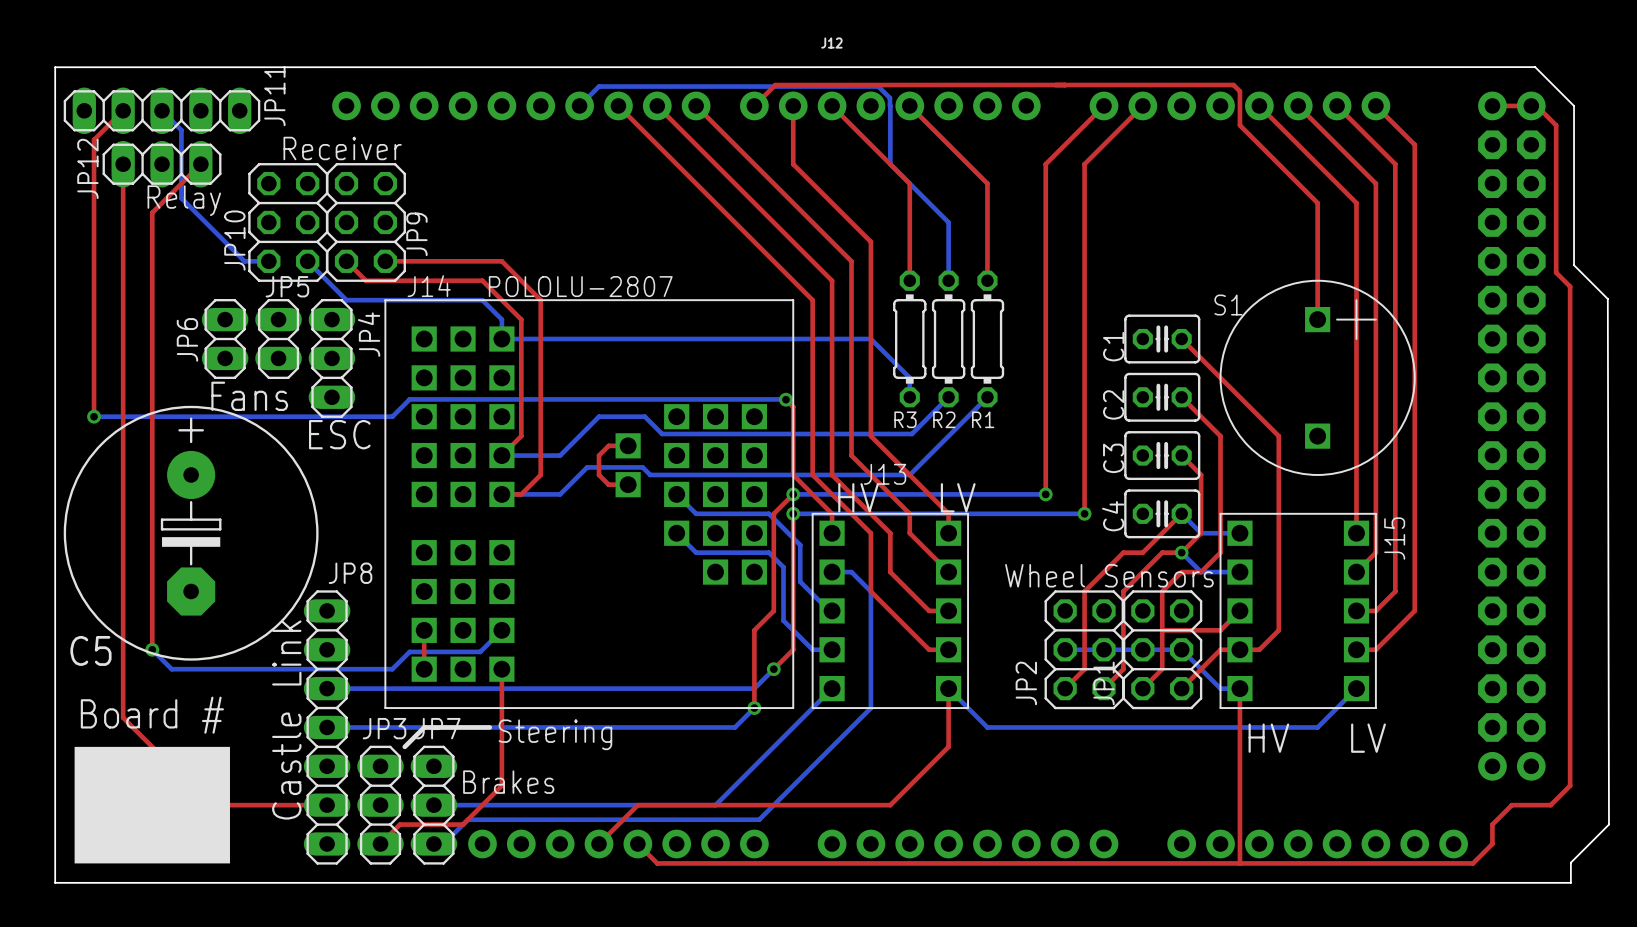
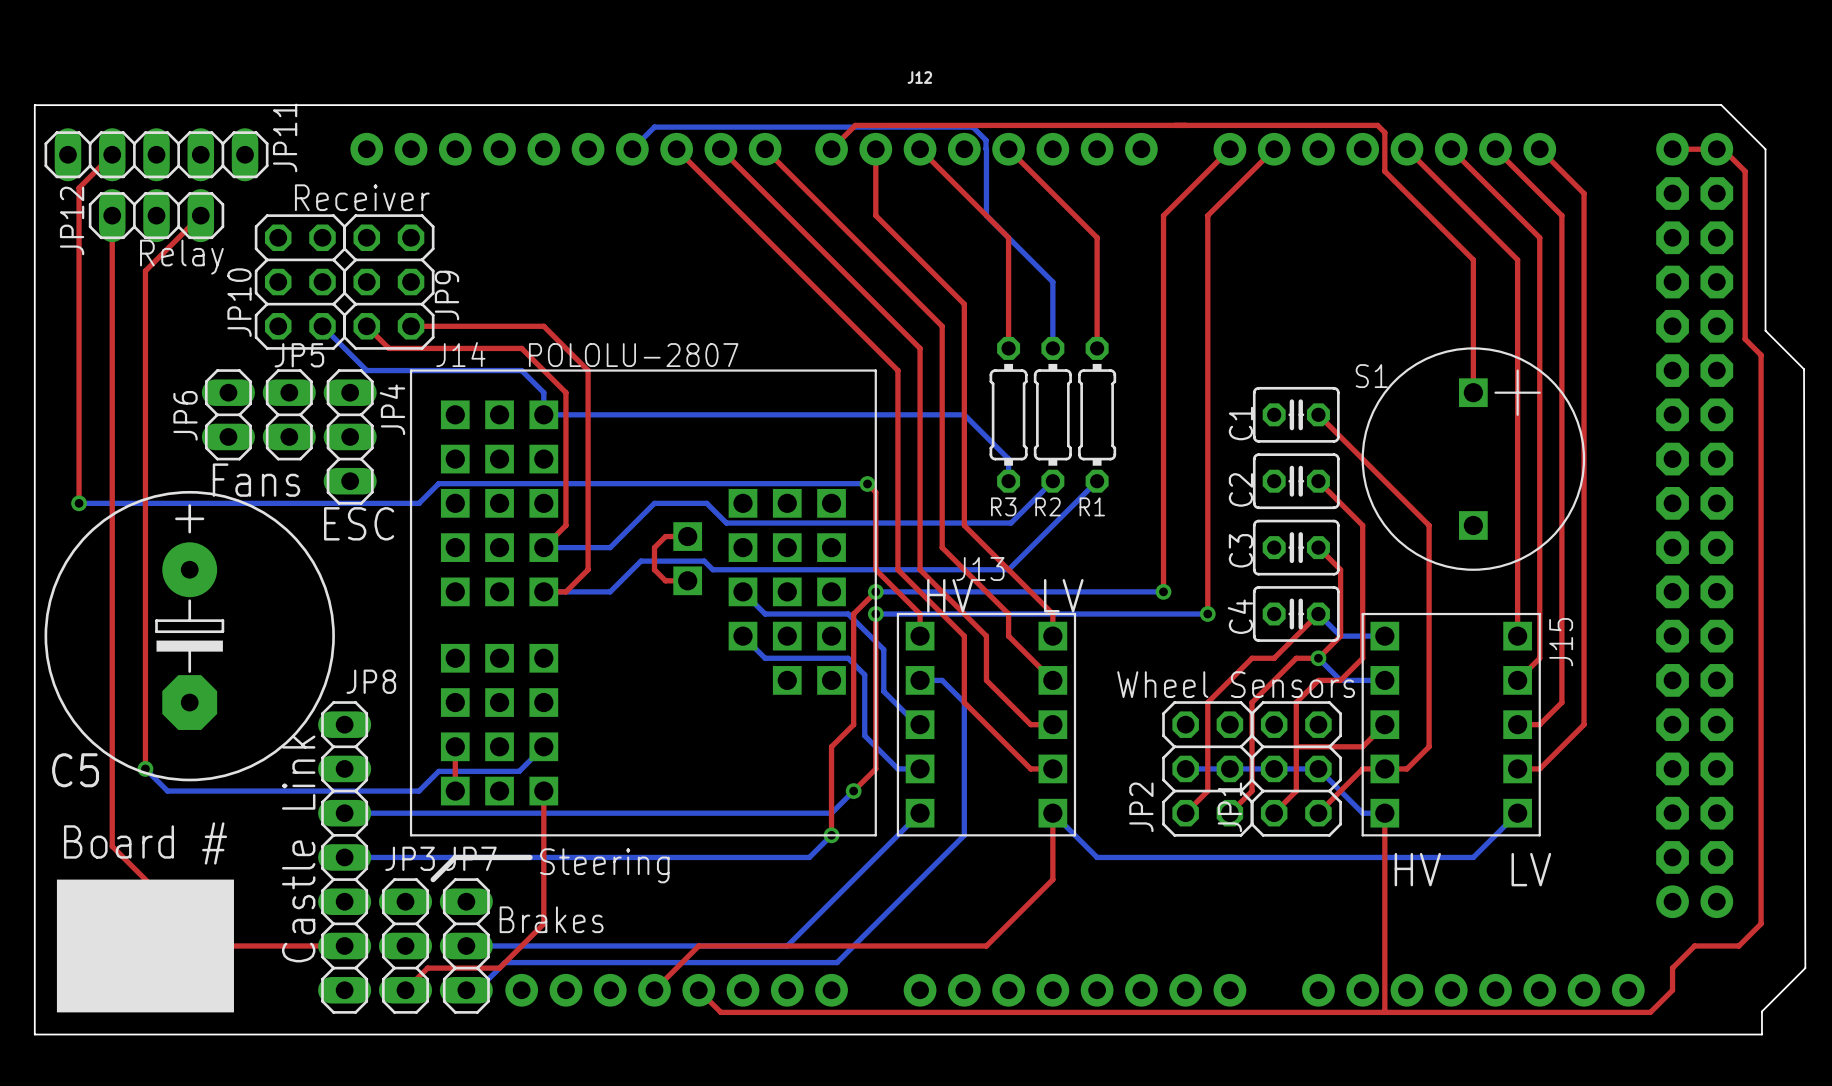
bottom track: (162, 110) (181, 130) (181, 198) (244, 261) (268, 261) -> none

